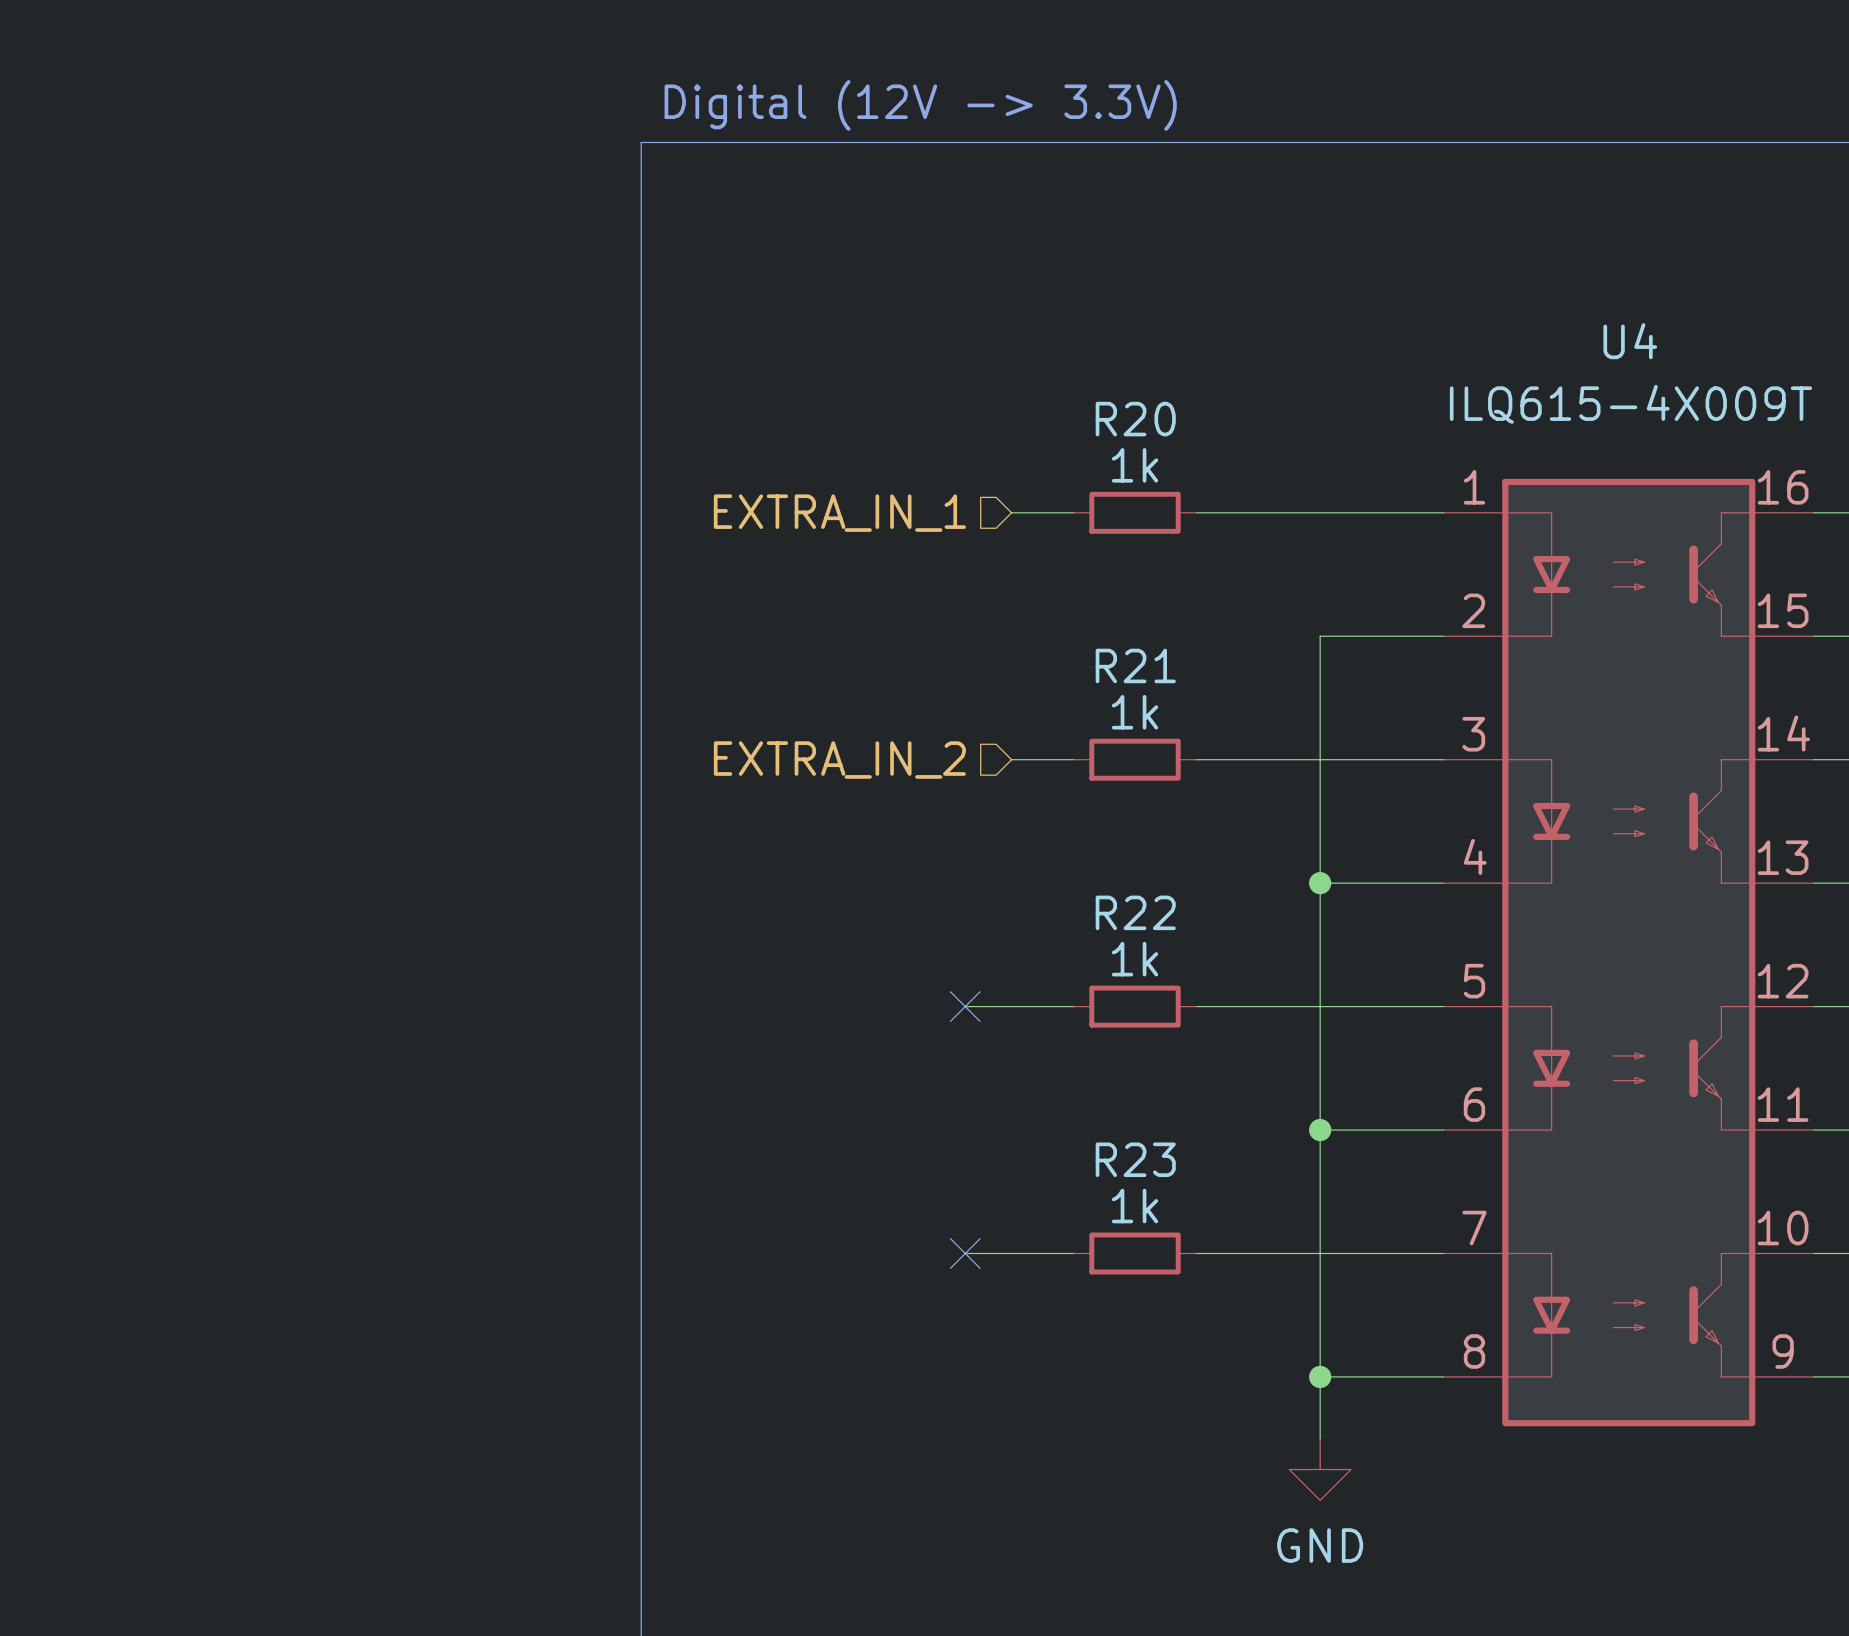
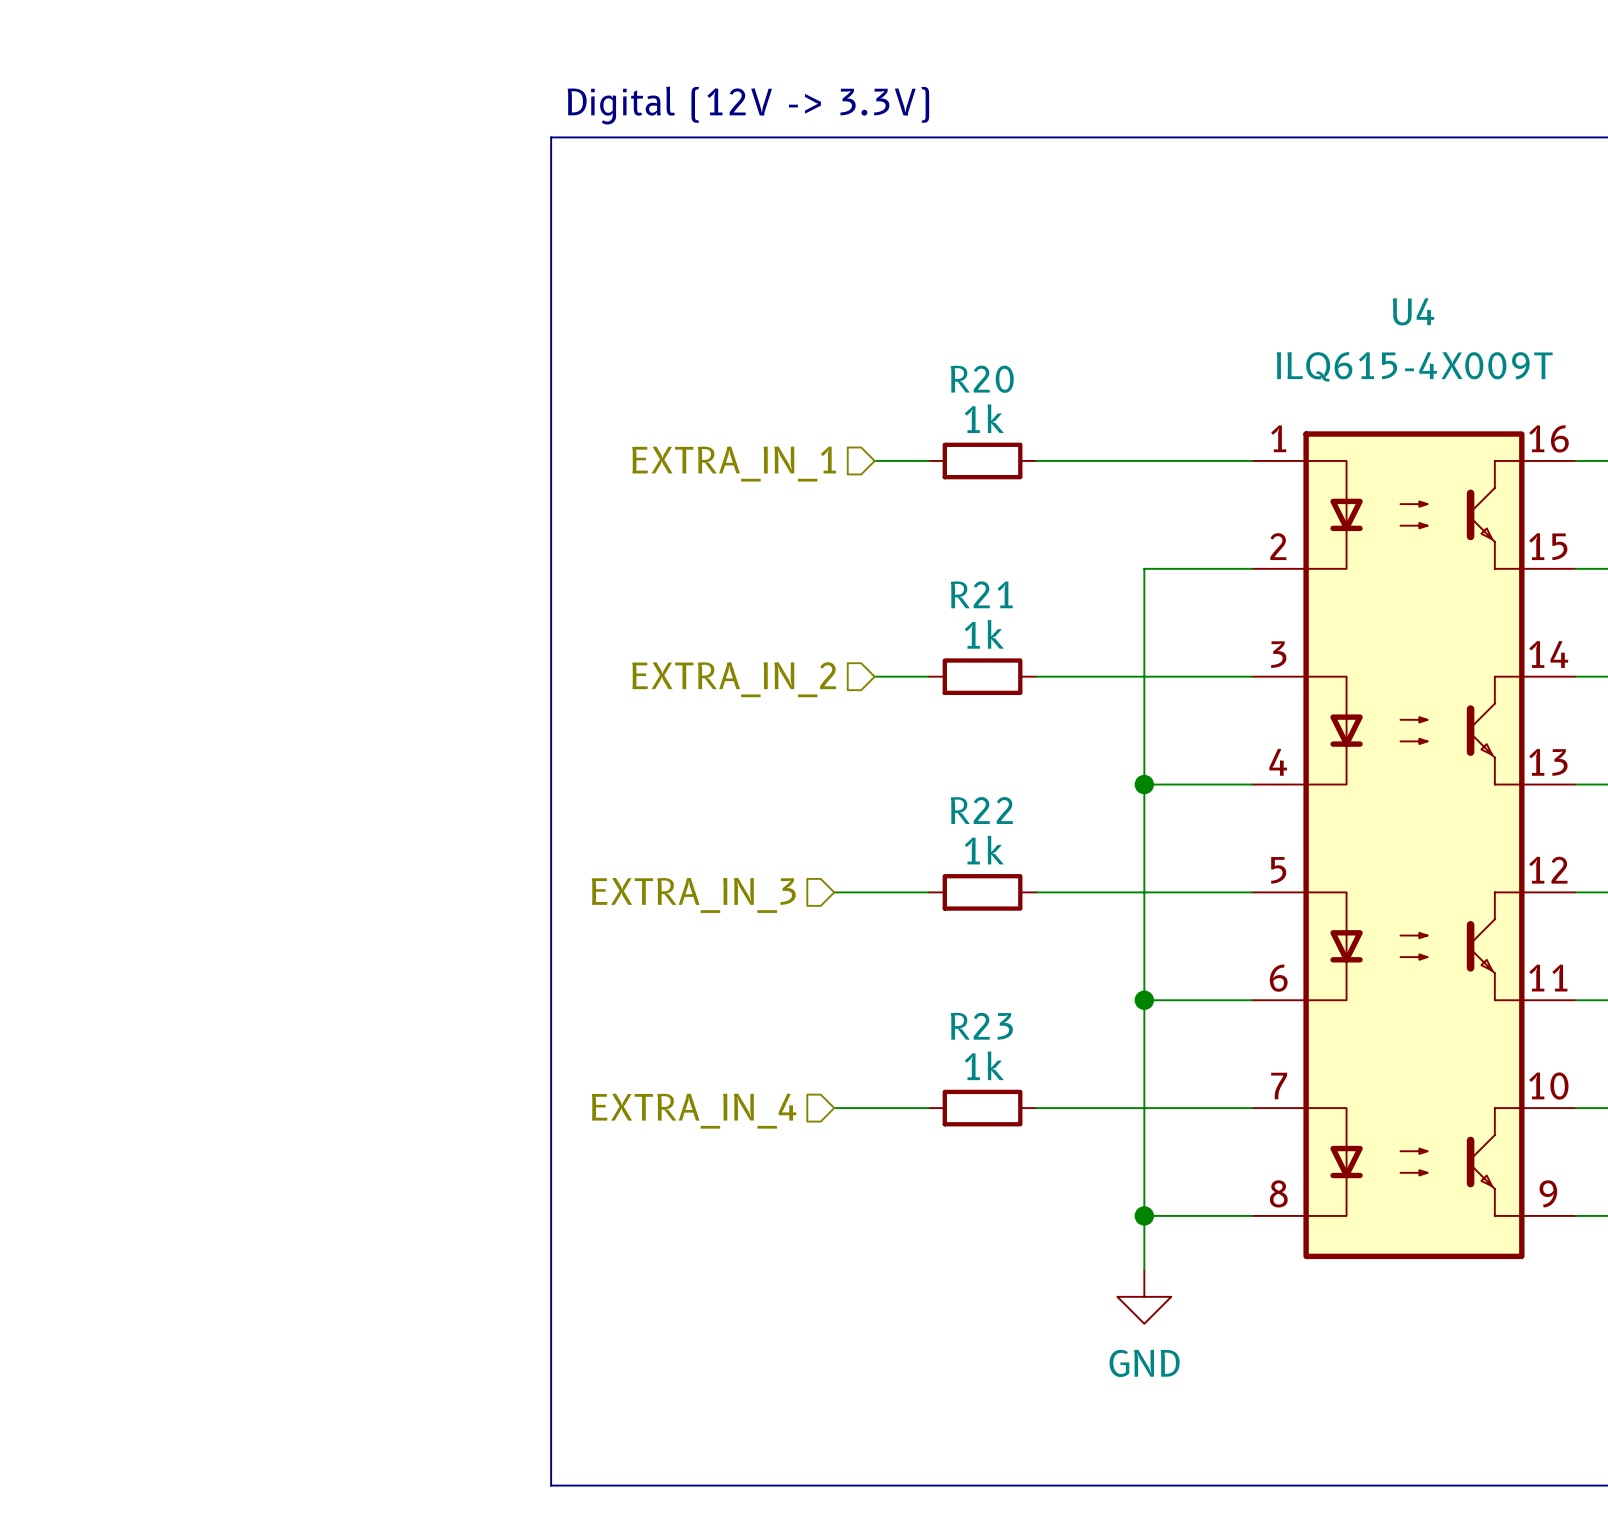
hierarchical label: none -> EXTRA_IN_3 (693, 895)
no-connect mark: (965, 1006) -> none
hierarchical label: none -> EXTRA_IN_4 (694, 1111)
no-connect mark: (965, 1253) -> none

